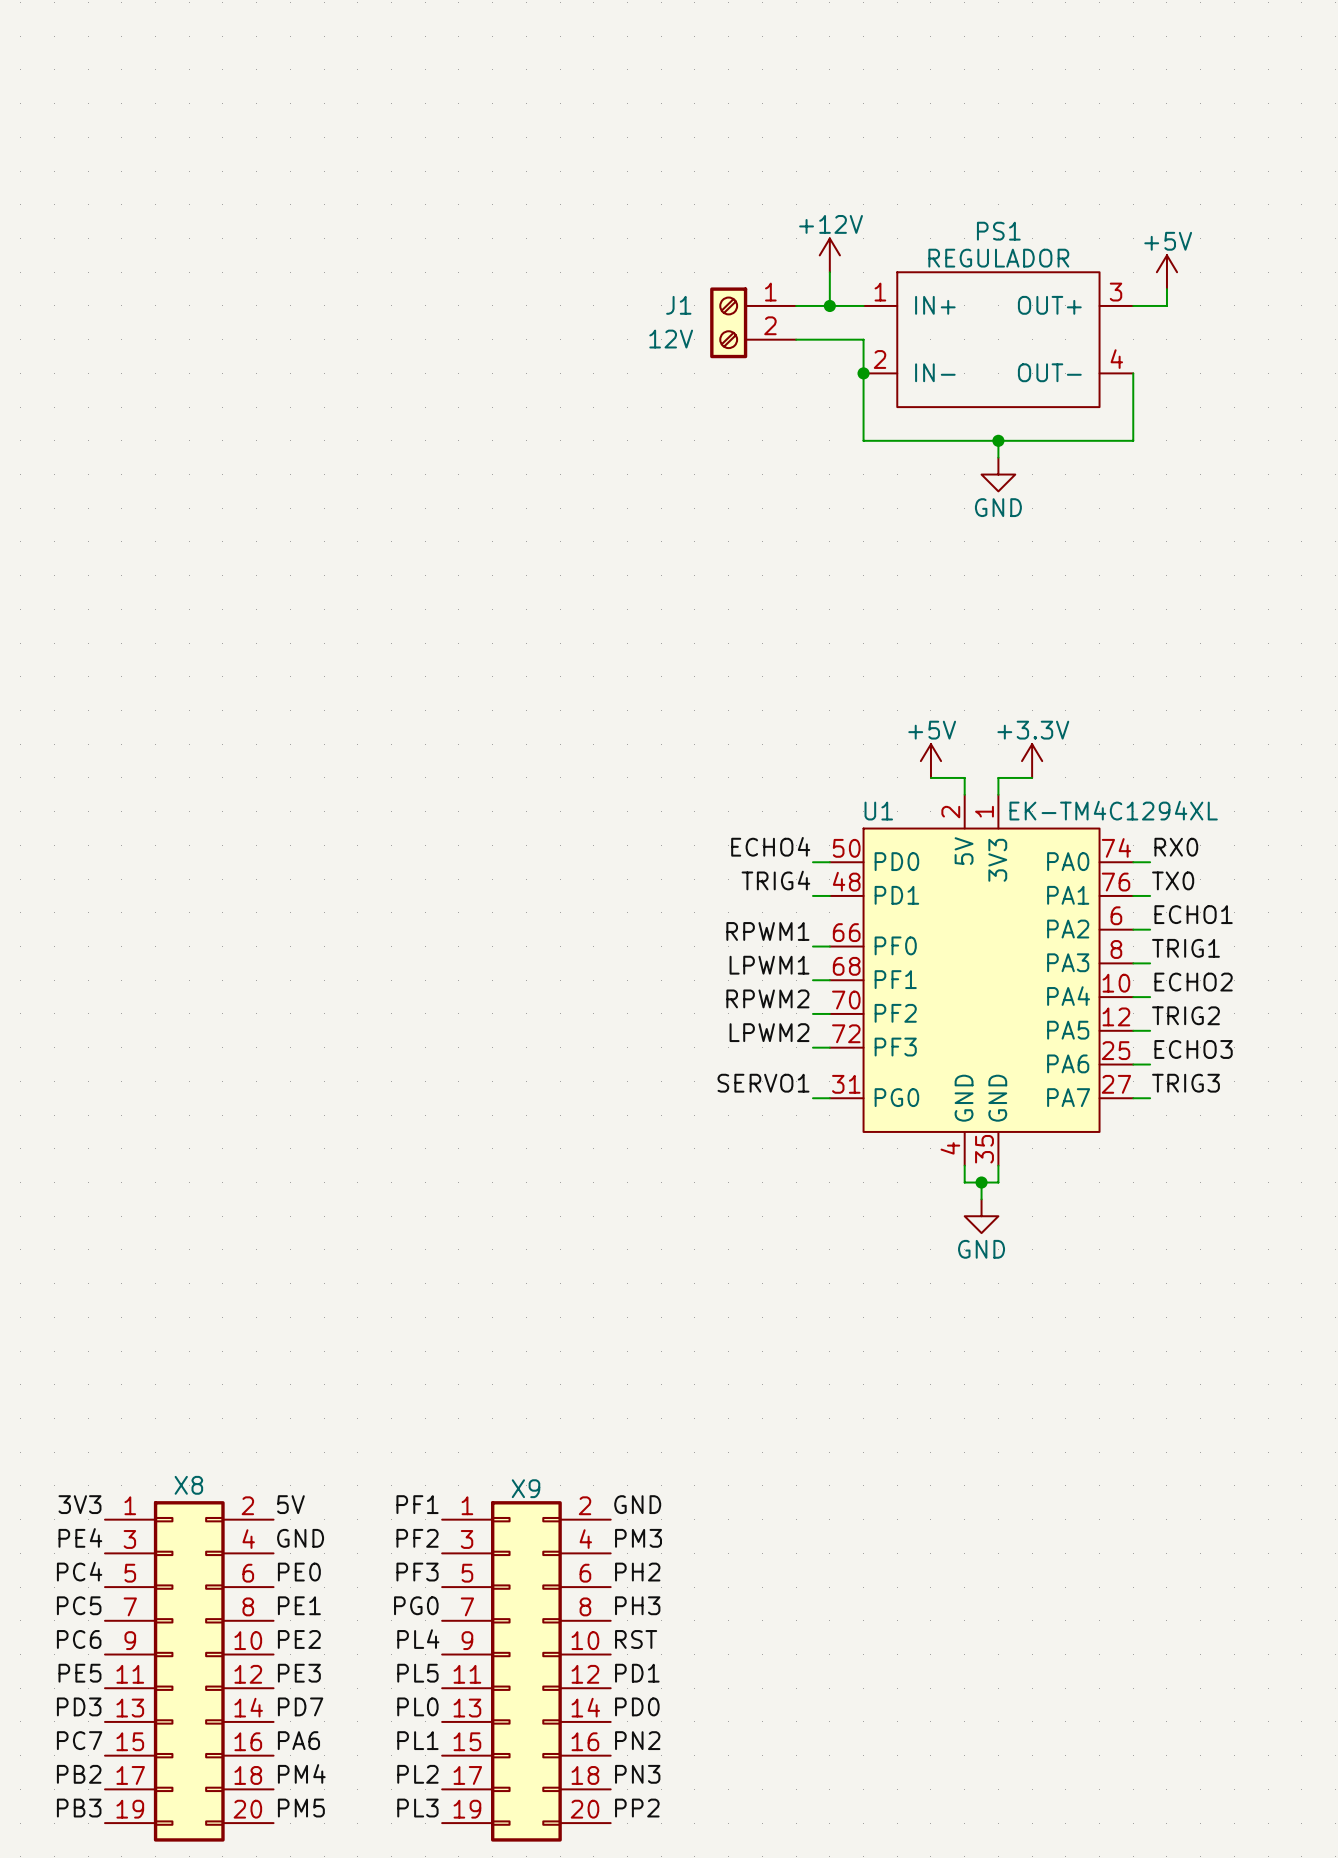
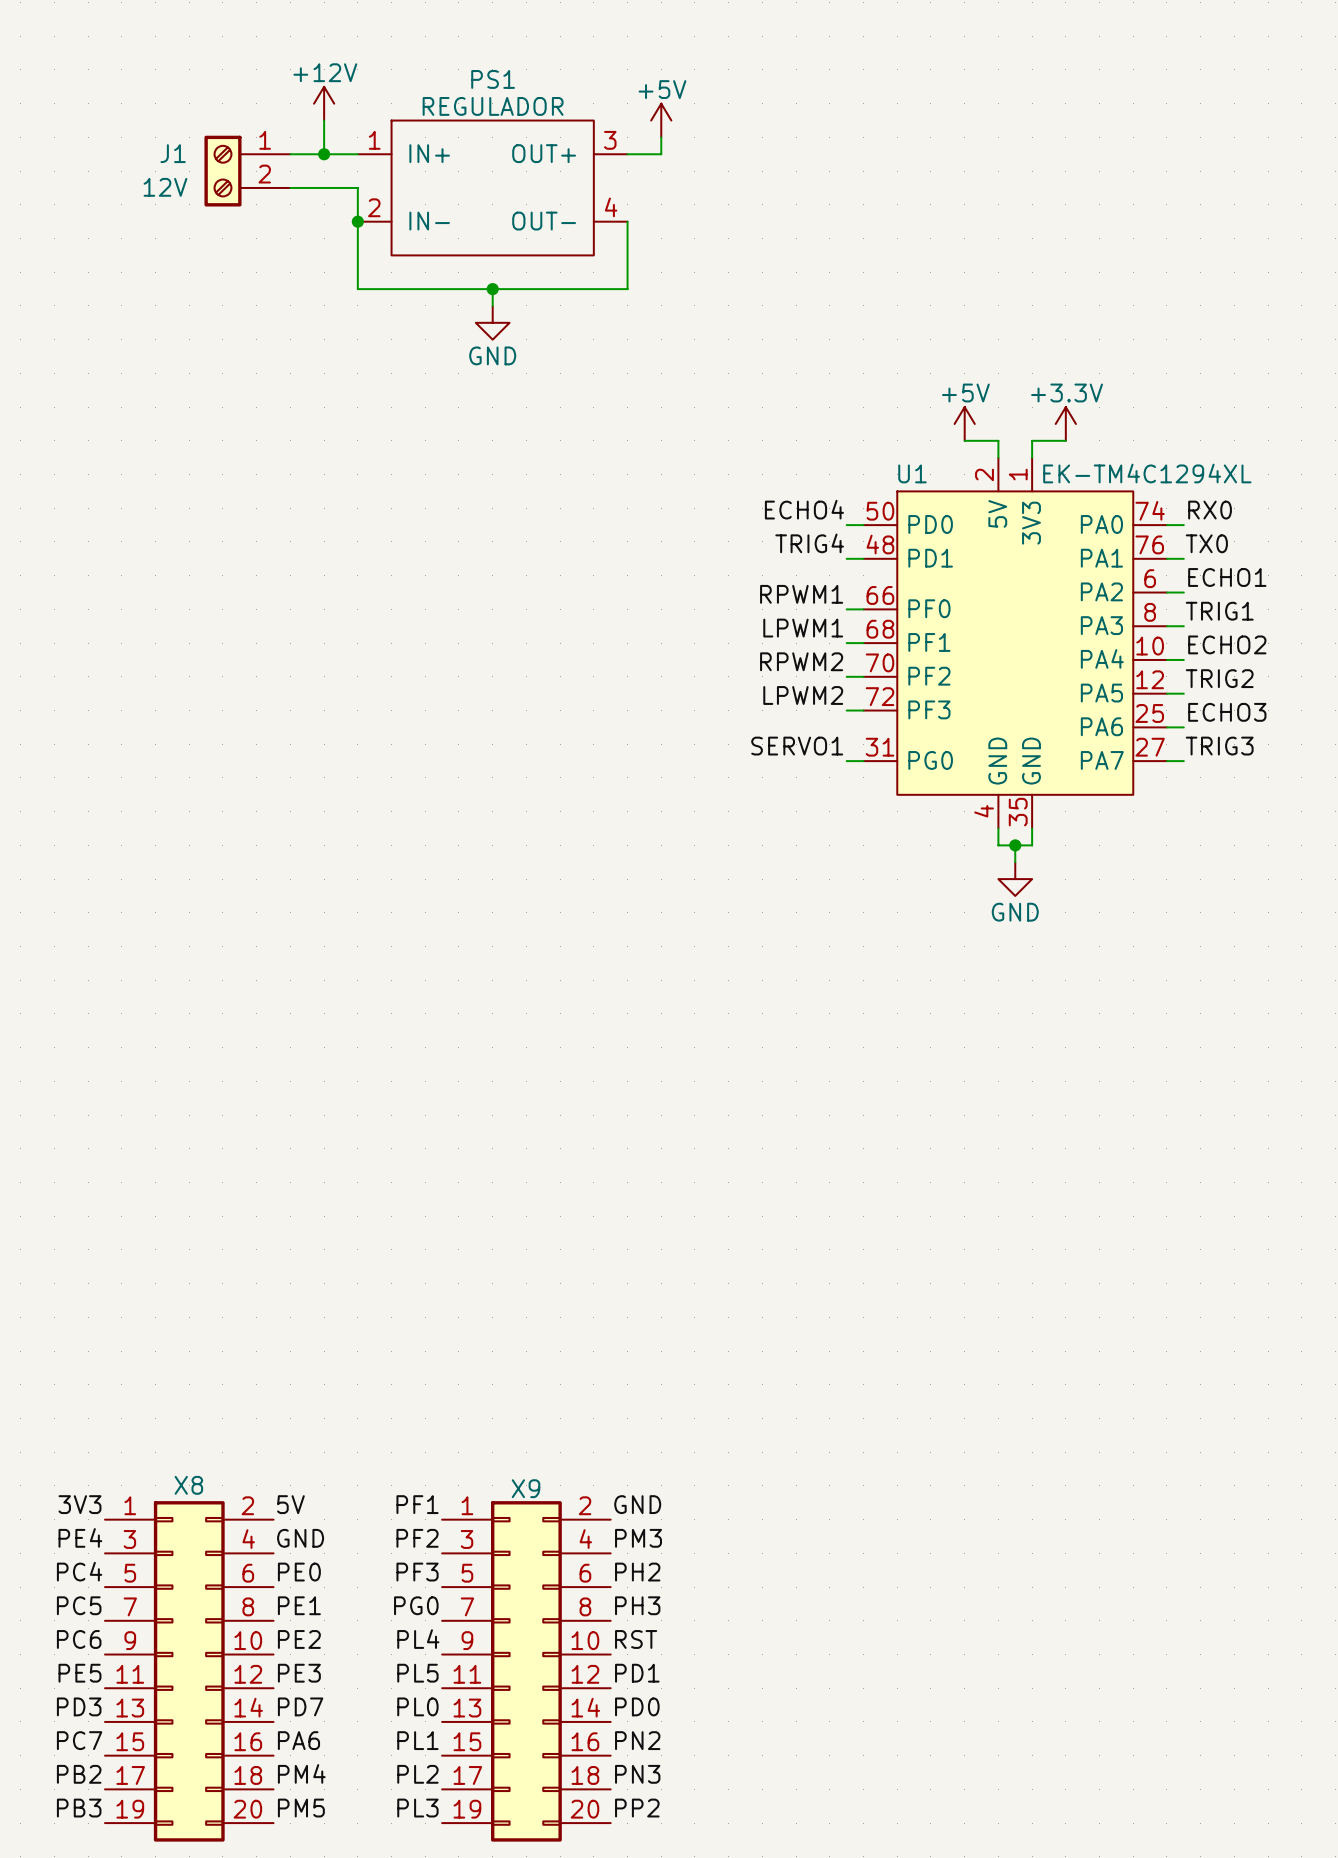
power symbol: none -> +12V (324, 103)
wire: none -> (324, 120) (324, 154)
power symbol: none -> +5V (661, 120)
wire: none -> (661, 137) (661, 154) (627, 154)
wire: none -> (290, 154) (357, 154)
junction: none -> (324, 154)
wire: none -> (290, 187) (357, 187) (357, 289) (627, 289) (627, 221)
junction: none -> (357, 221)
power symbol: +12V (829, 255) -> none
wire: (829, 272) (829, 305) -> none
power symbol: +5V (1166, 272) -> none
wire: none -> (492, 289) (492, 305)
junction: none -> (492, 289)
wire: (1166, 289) (1166, 305) (1133, 305) -> none
wire: (796, 305) (863, 305) -> none
junction: (829, 305) -> none
power symbol: none -> GND (492, 322)
J1 position: (753, 322) -> (247, 171)
wire: (796, 339) (863, 339) (863, 440) (964, 440) -> none
PS1 position: (998, 339) -> (492, 187)
junction: (863, 373) -> none
wire: (1133, 373) (1133, 440) (1065, 440) -> none
power symbol: none -> +5V (964, 423)
power symbol: none -> +3.3V (1065, 423)
wire: (998, 440) (1032, 440) -> (1032, 457) (1032, 440)
junction: (998, 440) -> none
power symbol: GND (998, 474) -> none
label: none -> ECHO4 (804, 509)
label: none -> RX0 (1210, 510)
wire: none -> (846, 525) (863, 525)
wire: none -> (1166, 525) (1183, 525)
label: none -> TRIG4 (809, 543)
label: none -> TX0 (1206, 543)
label: none -> ECHO1 (1227, 577)
label: none -> RPWM1 (801, 594)
wire: none -> (846, 609) (863, 609)
label: none -> TRIG1 (1219, 611)
label: none -> LPWM1 (803, 628)
label: none -> ECHO2 (1227, 644)
label: none -> RPWM2 (801, 661)
label: none -> TRIG2 (1219, 678)
label: none -> LPWM2 (803, 695)
label: none -> ECHO3 (1227, 712)
label: none -> SERVO1 (797, 746)
label: none -> TRIG3 (1219, 746)
power symbol: +5V (930, 761) -> none
power symbol: +3.3V (1032, 761) -> none
junction: none -> (1015, 845)
label: ECHO4 (770, 846) -> none
label: RX0 (1176, 847) -> none
wire: (812, 862) (829, 862) -> (846, 558) (863, 558)
wire: (1133, 862) (1150, 862) -> (1166, 558) (1183, 558)
power symbol: none -> GND (1015, 879)
label: TRIG4 (775, 880) -> none
label: TX0 (1173, 880) -> none
wire: (812, 895) (829, 895) -> (846, 761) (863, 761)
wire: (1133, 895) (1150, 895) -> (1166, 592) (1183, 592)
label: ECHO1 (1193, 914) -> none
wire: (1133, 929) (1150, 929) -> (1166, 626) (1183, 626)
label: RPWM1 (767, 931) -> none
wire: (812, 946) (829, 946) -> (846, 643) (863, 643)
label: TRIG1 (1185, 948) -> none
wire: (1133, 963) (1150, 963) -> (1166, 659) (1183, 659)
label: LPWM1 (769, 965) -> none
wire: (812, 980) (829, 980) -> (846, 676) (863, 676)
U1 position: (981, 980) -> (1015, 643)
label: ECHO2 (1193, 982) -> none
wire: (1133, 997) (1150, 997) -> (1166, 693) (1183, 693)
label: RPWM2 (767, 998) -> none
wire: (812, 1013) (829, 1013) -> (846, 710) (863, 710)
label: TRIG2 (1185, 1015) -> none
wire: (1133, 1030) (1150, 1030) -> (1166, 727) (1183, 727)
label: LPWM2 (769, 1032) -> none
wire: (812, 1047) (829, 1047) -> none
label: ECHO3 (1193, 1049) -> none
wire: (1133, 1064) (1150, 1064) -> (1166, 761) (1183, 761)
label: SERVO1 (763, 1083) -> none
label: TRIG3 (1185, 1083) -> none
wire: (812, 1098) (829, 1098) -> none
wire: (1133, 1098) (1150, 1098) -> none
wire: (964, 1165) (964, 1182) (998, 1182) (998, 1165) -> none
wire: (981, 1182) (981, 1199) -> none
junction: (981, 1182) -> none
power symbol: GND (981, 1216) -> none

